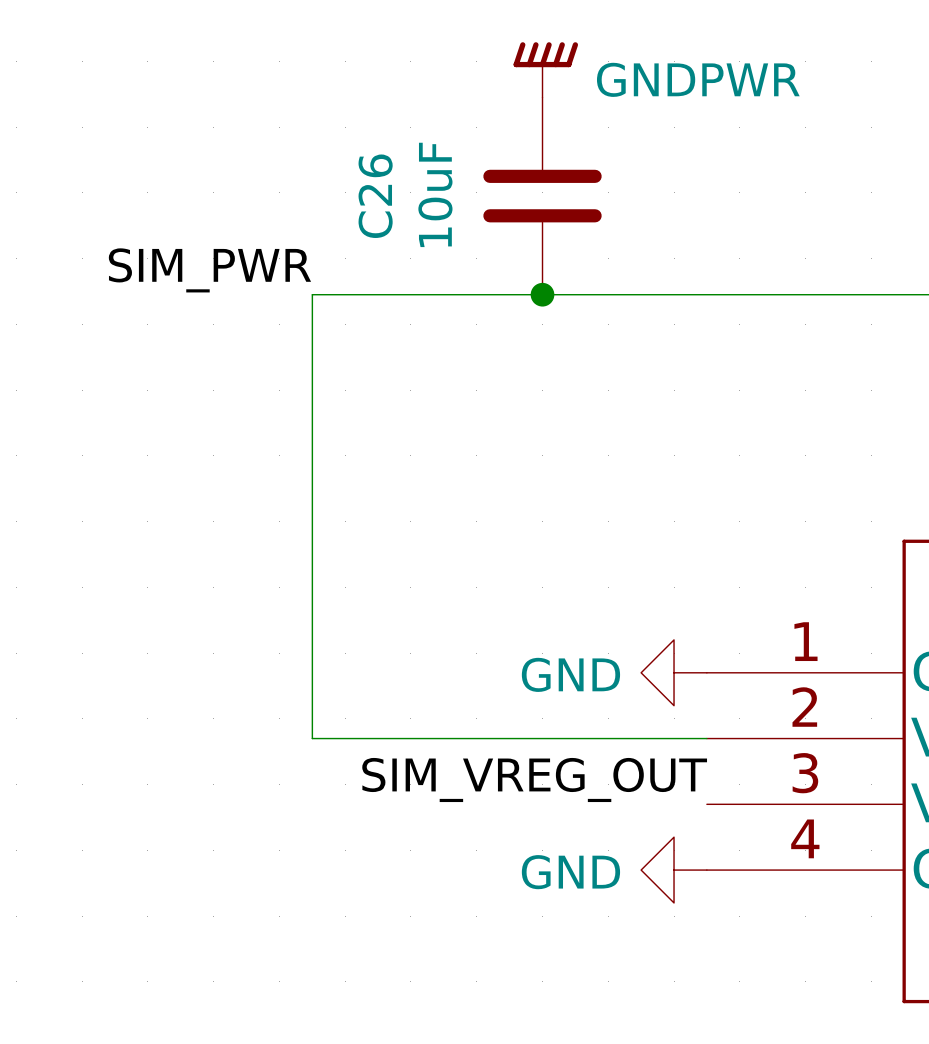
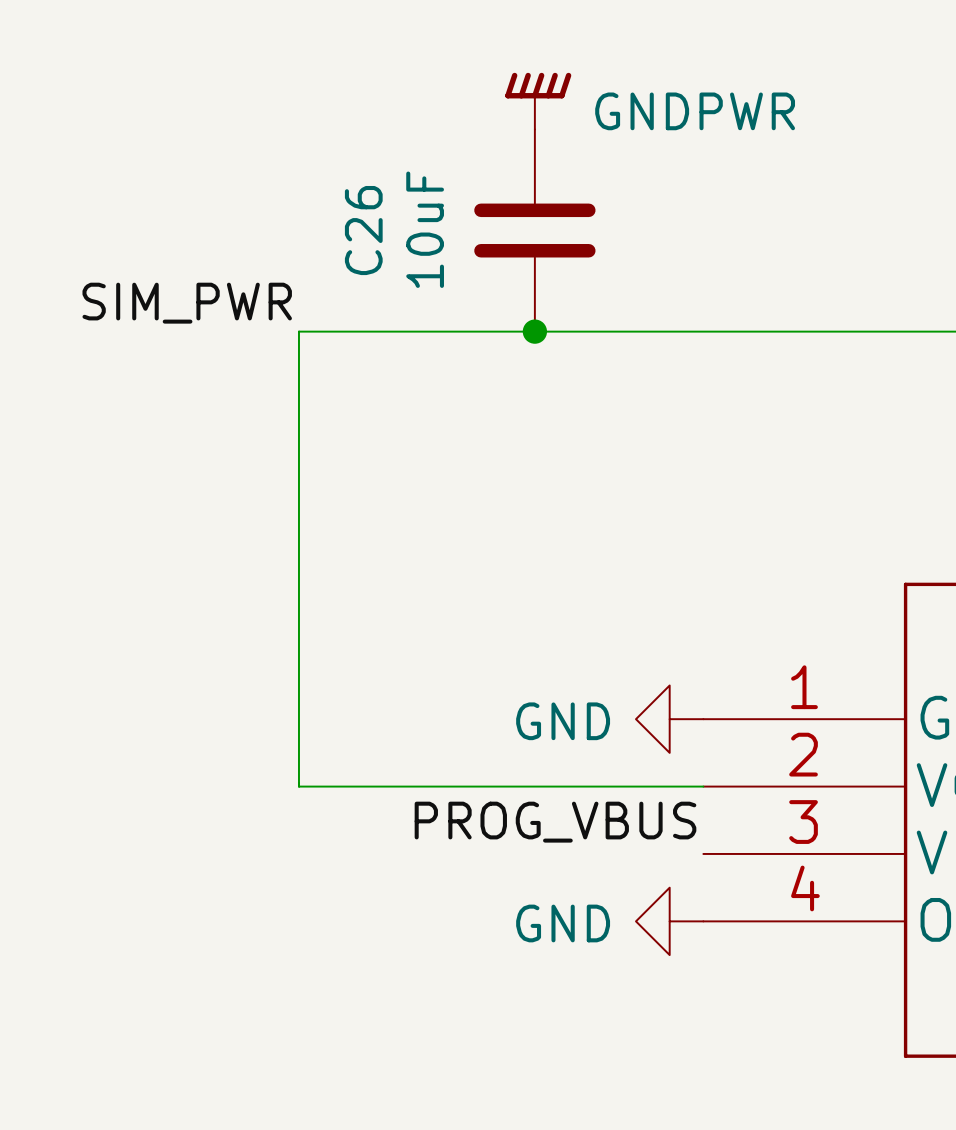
label: SIM_VREG_OUT (534, 779) -> PROG_VBUS (555, 822)

